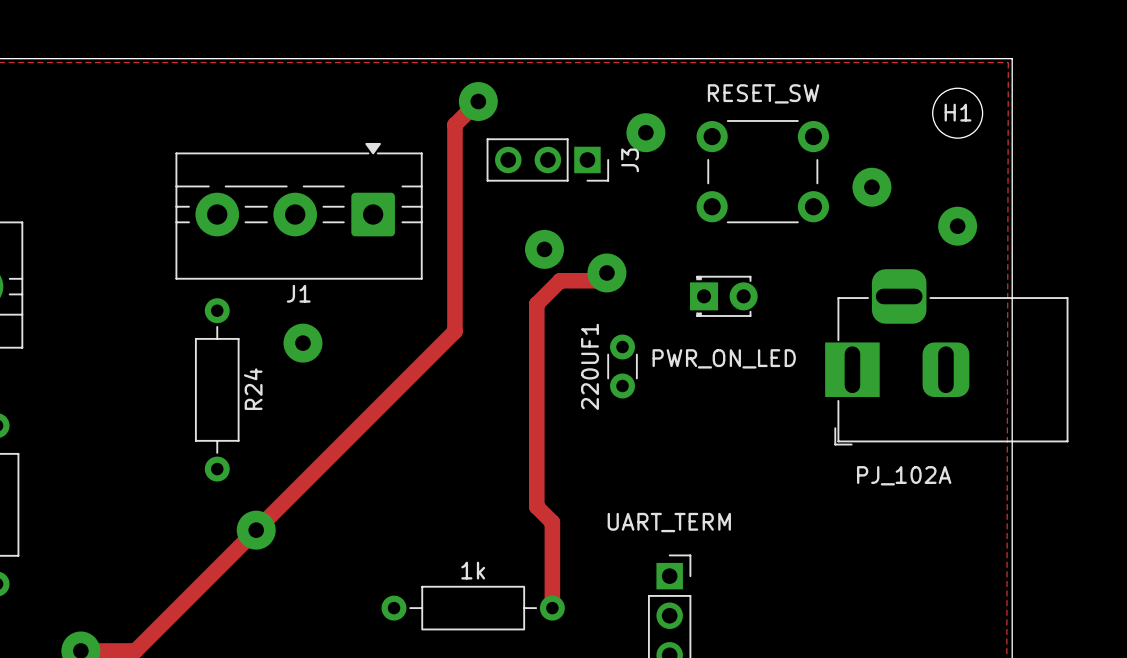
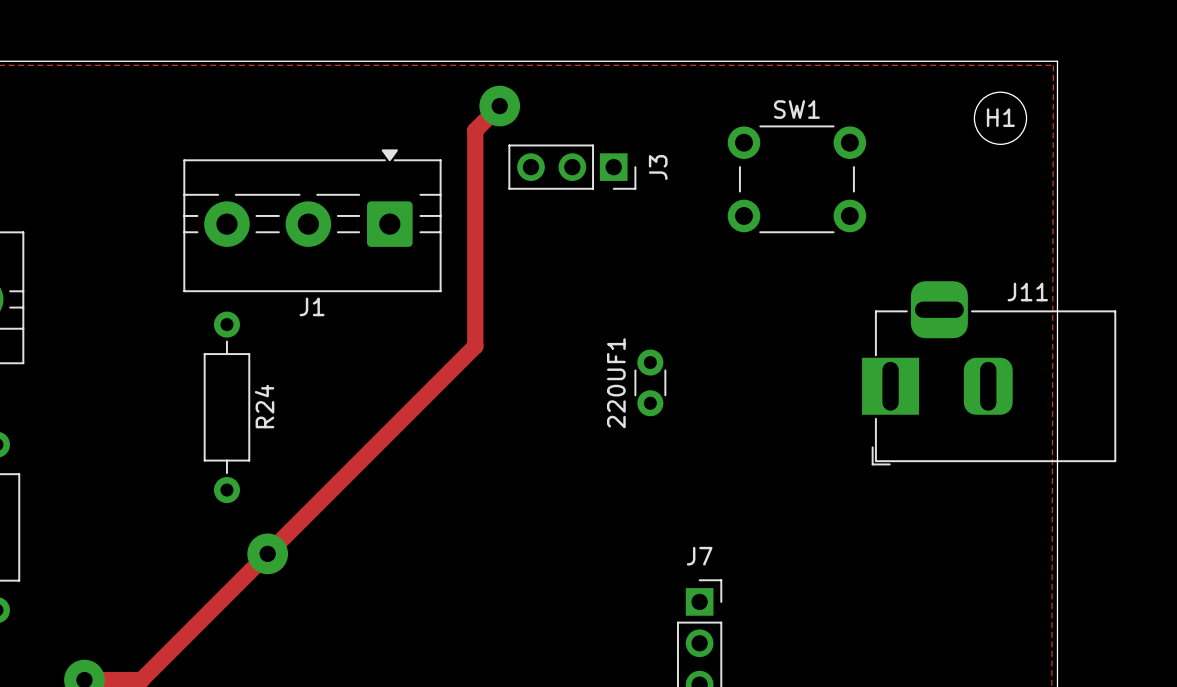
RESET_SW name: RESET_SW (763, 93) -> SW1 (796, 109)
via: (645, 132) -> none
via: (871, 187) -> none
via: (957, 226) -> none
via: (544, 249) -> none
track: (606, 272) (599, 280) (560, 280) (536, 304) (536, 506) (552, 522) (552, 608) -> none
via: (606, 272) -> none
PWR_ON_LED: (723, 296) -> none
via: (302, 343) -> none
PJ_102A name: PJ_102A (904, 475) -> J11 (1027, 292)
UART_TERM name: UART_TERM (669, 522) -> J7 (699, 556)
1k: (473, 608) -> none

